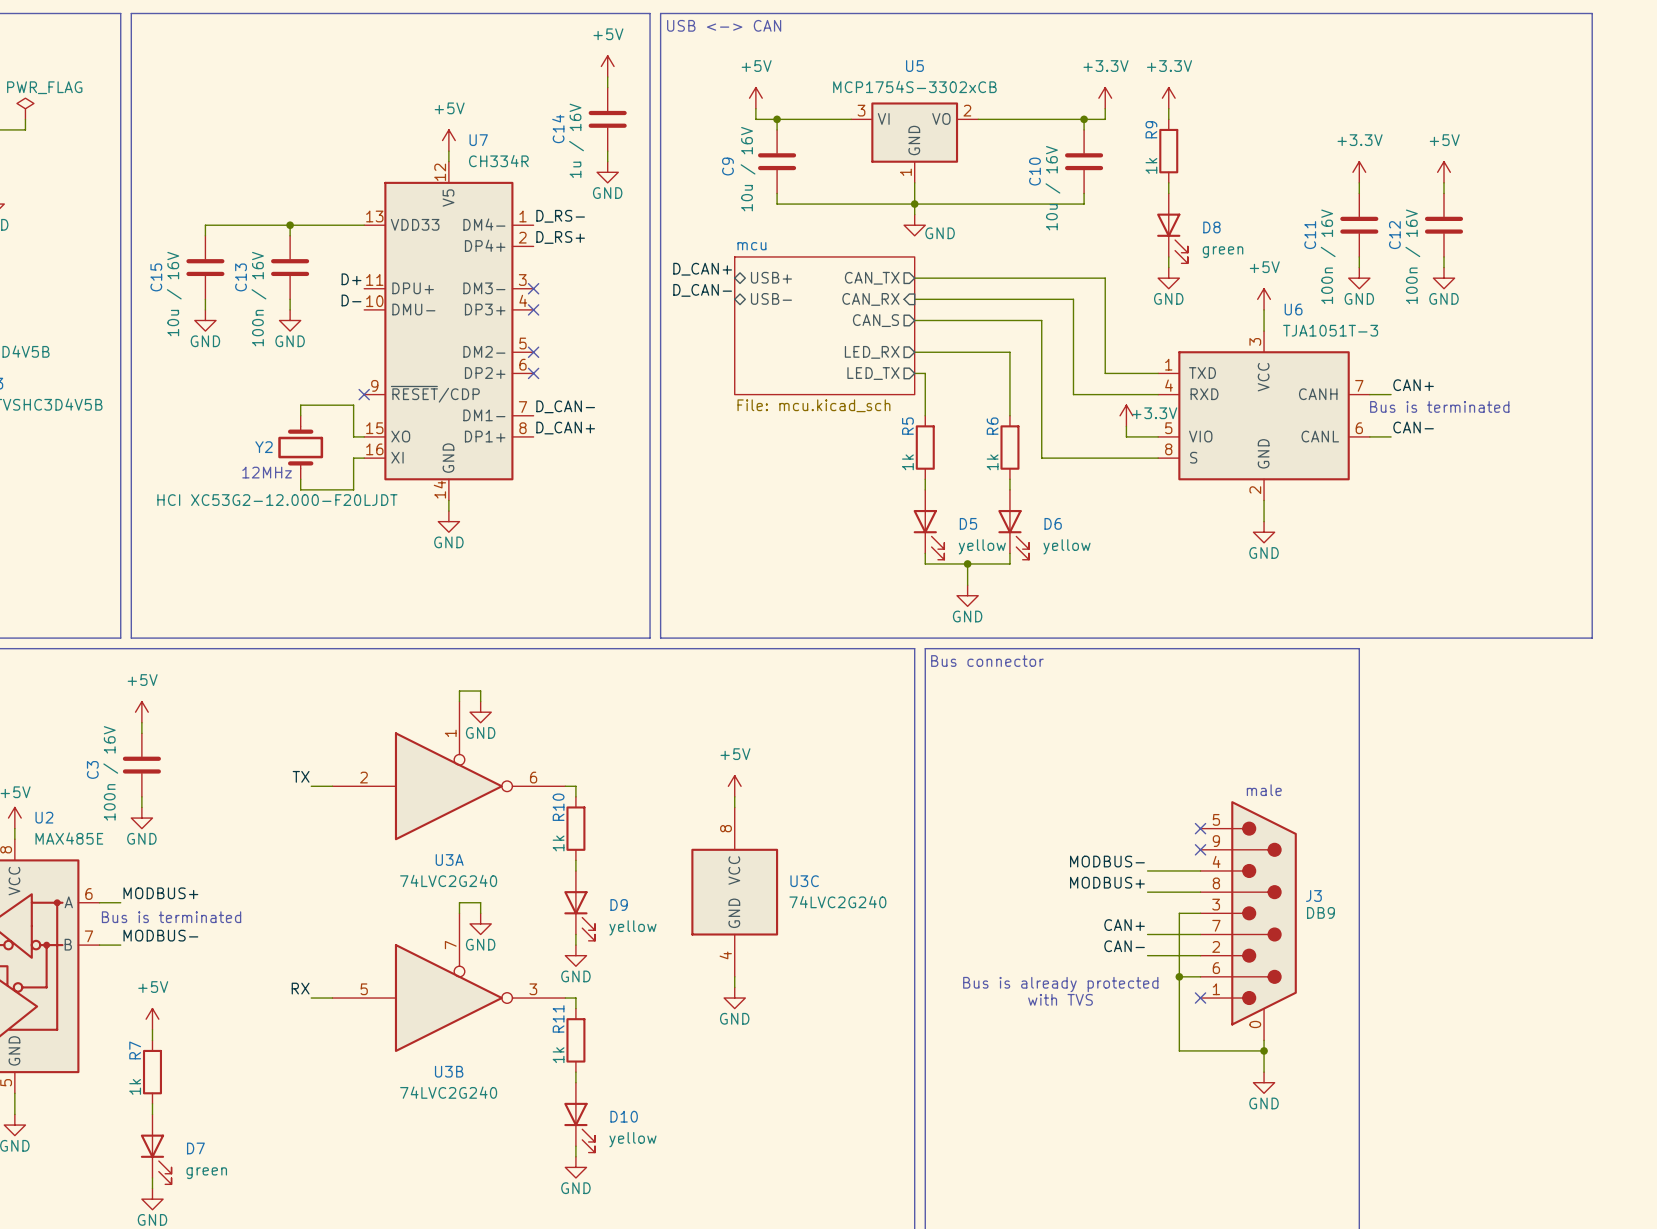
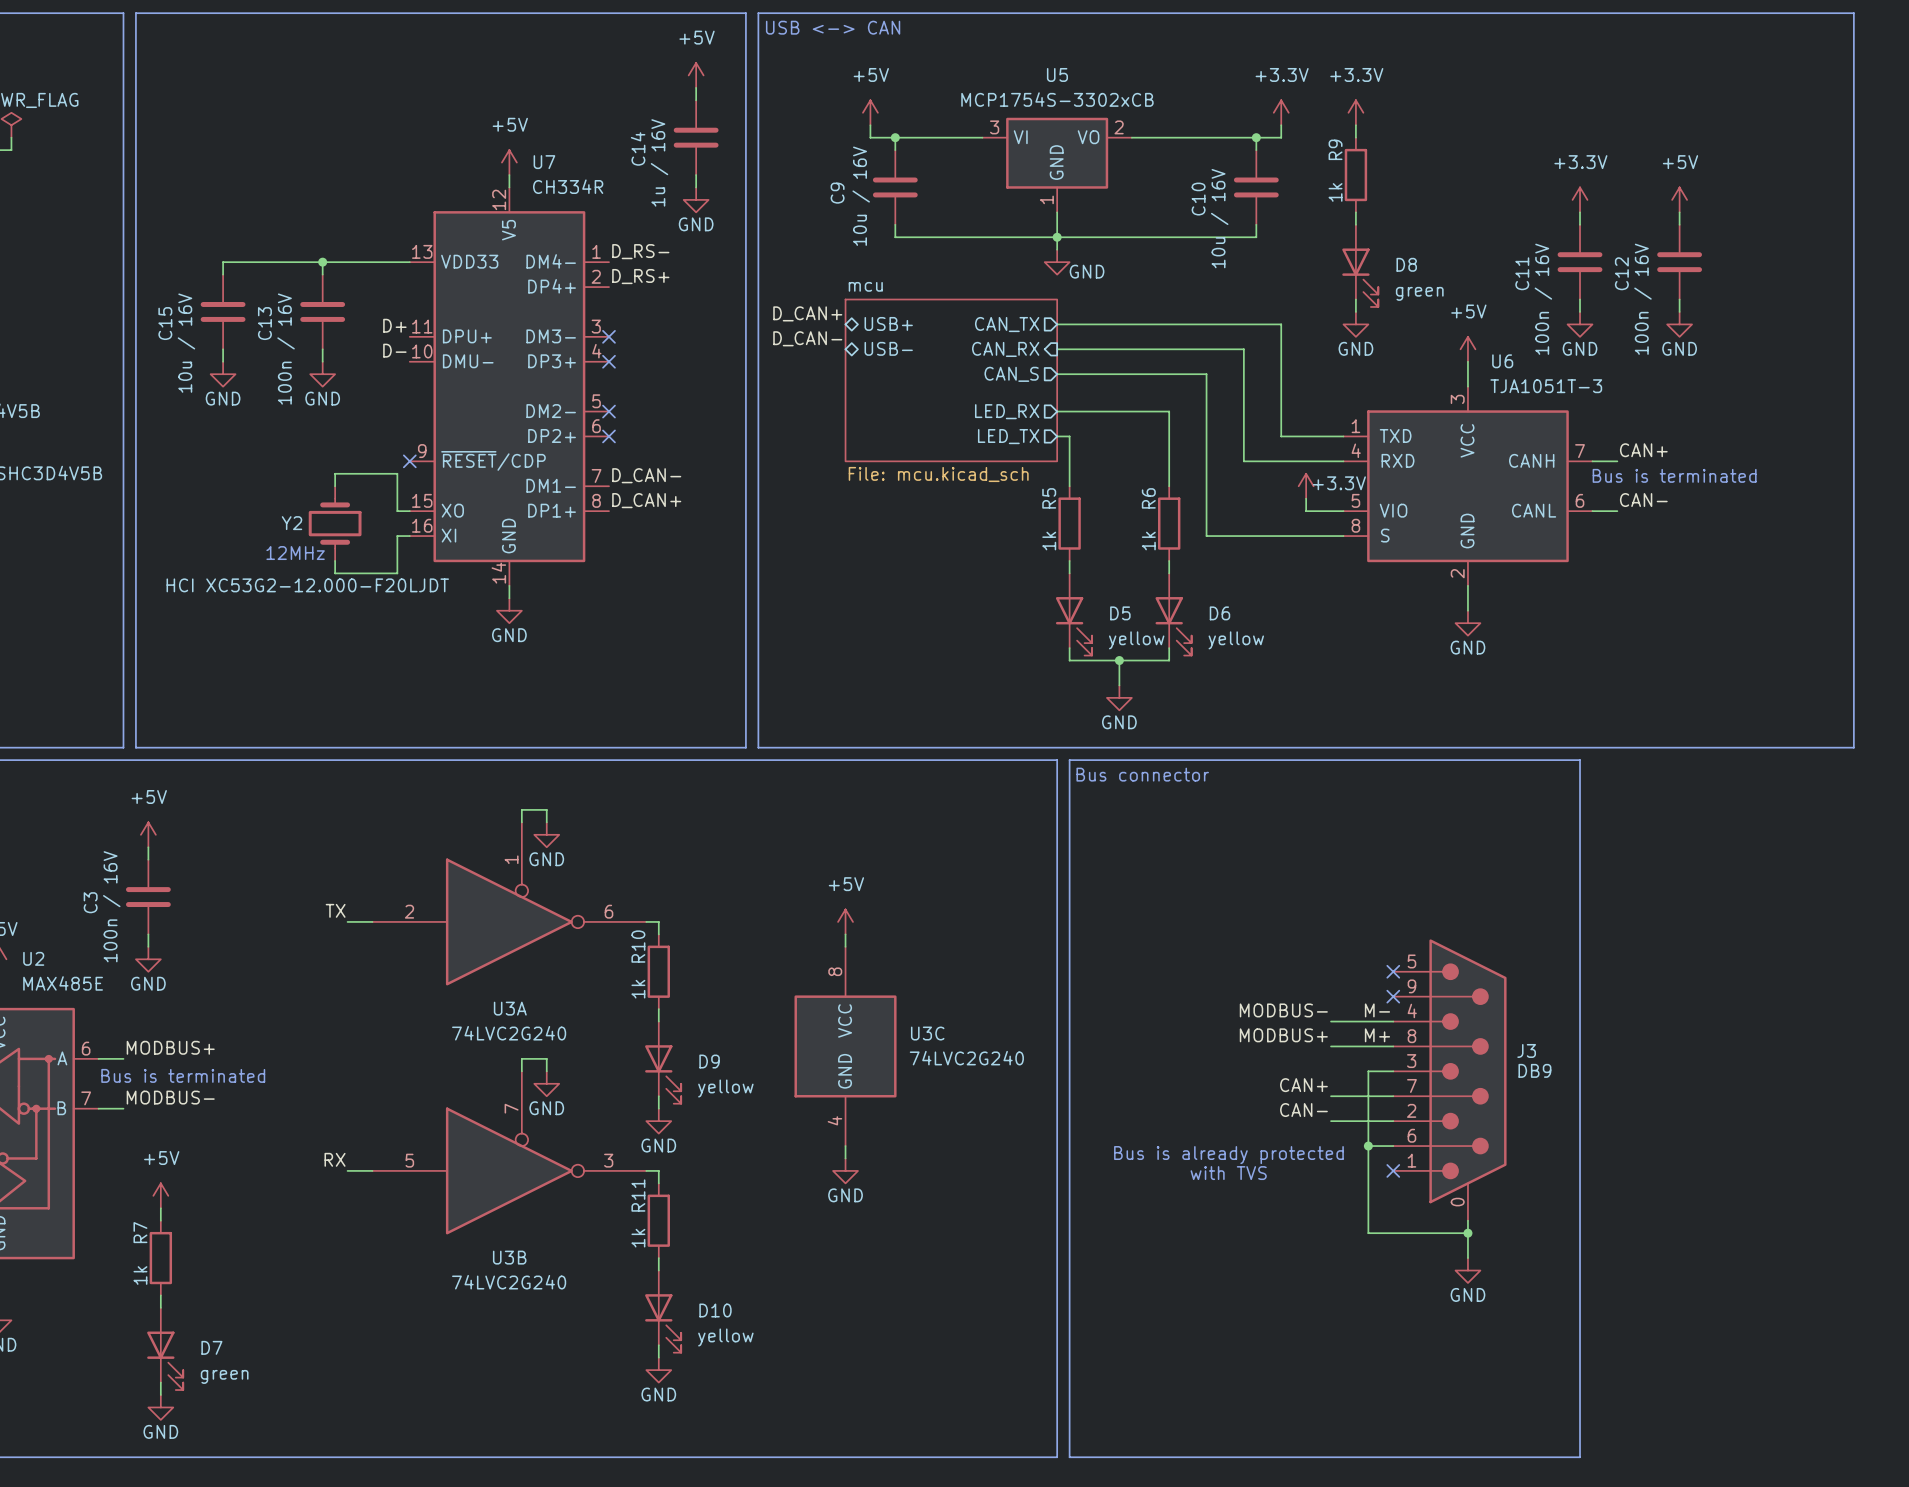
text: male (1264, 790) -> none
label: none -> M- (1377, 1010)
label: none -> M+ (1377, 1035)

